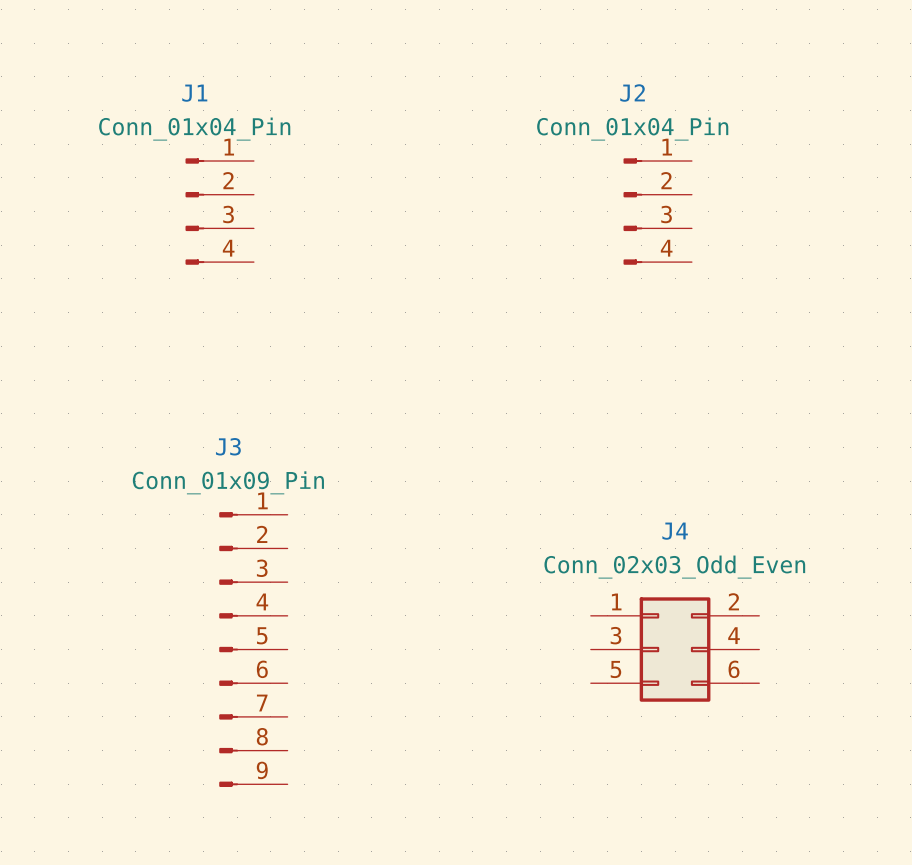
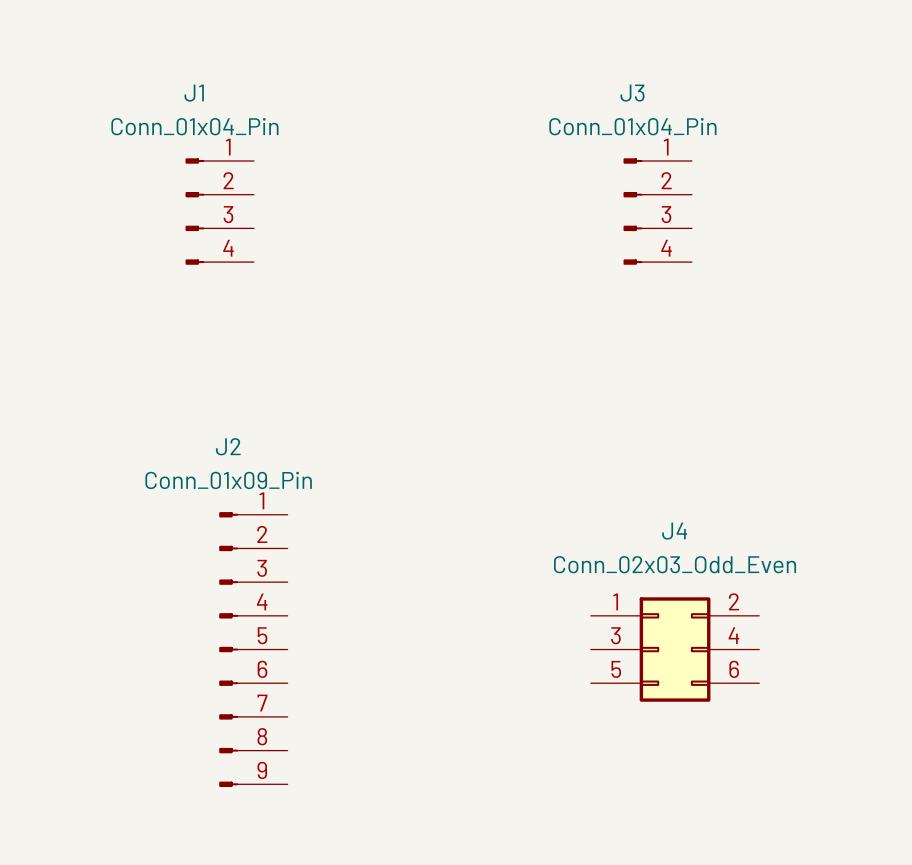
J2 name: J2 (632, 93) -> J3 (632, 93)
J3 name: J3 (228, 446) -> J2 (228, 446)

